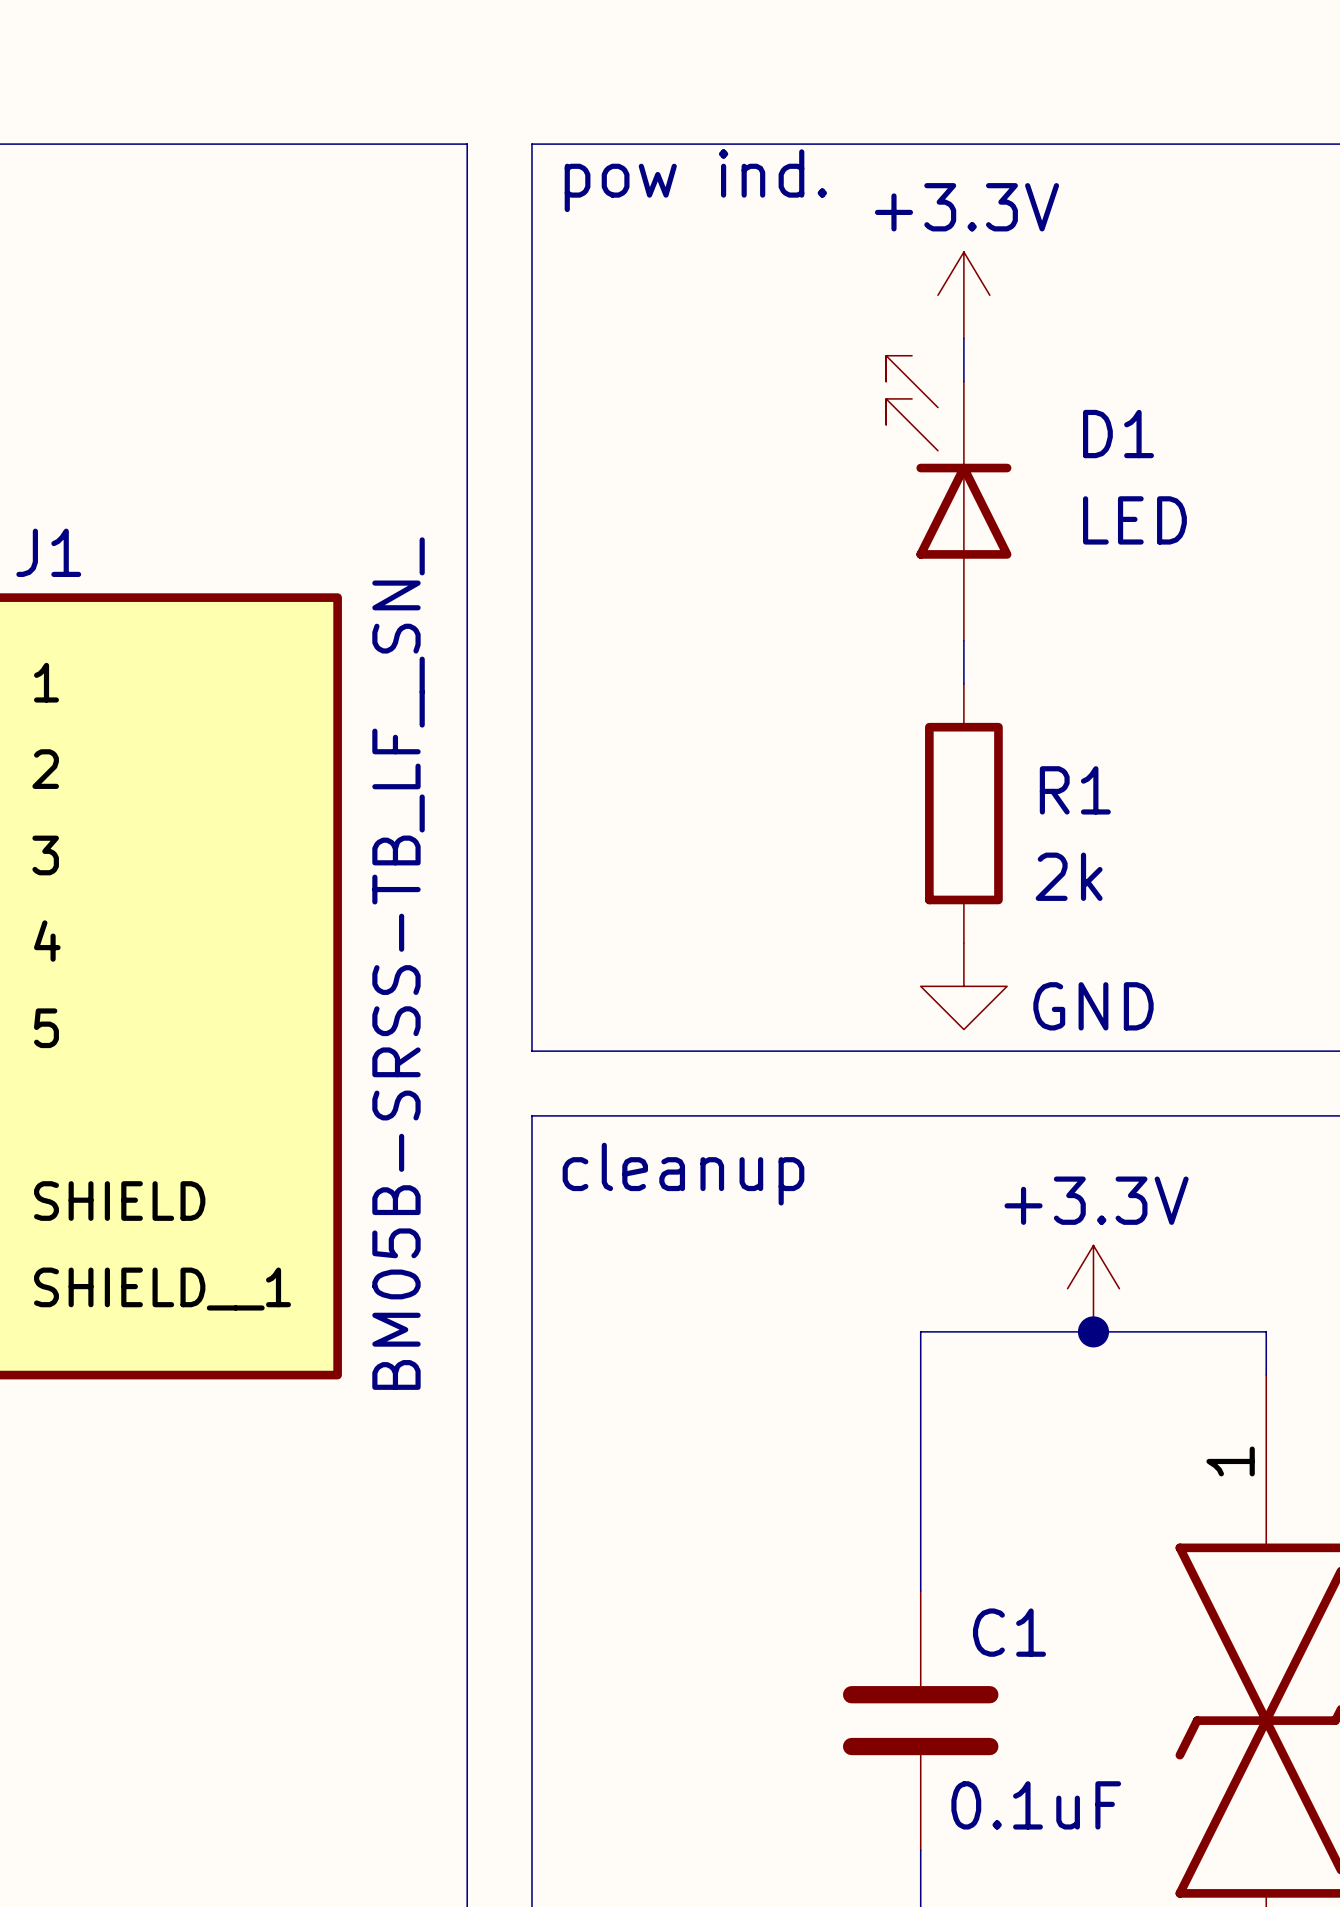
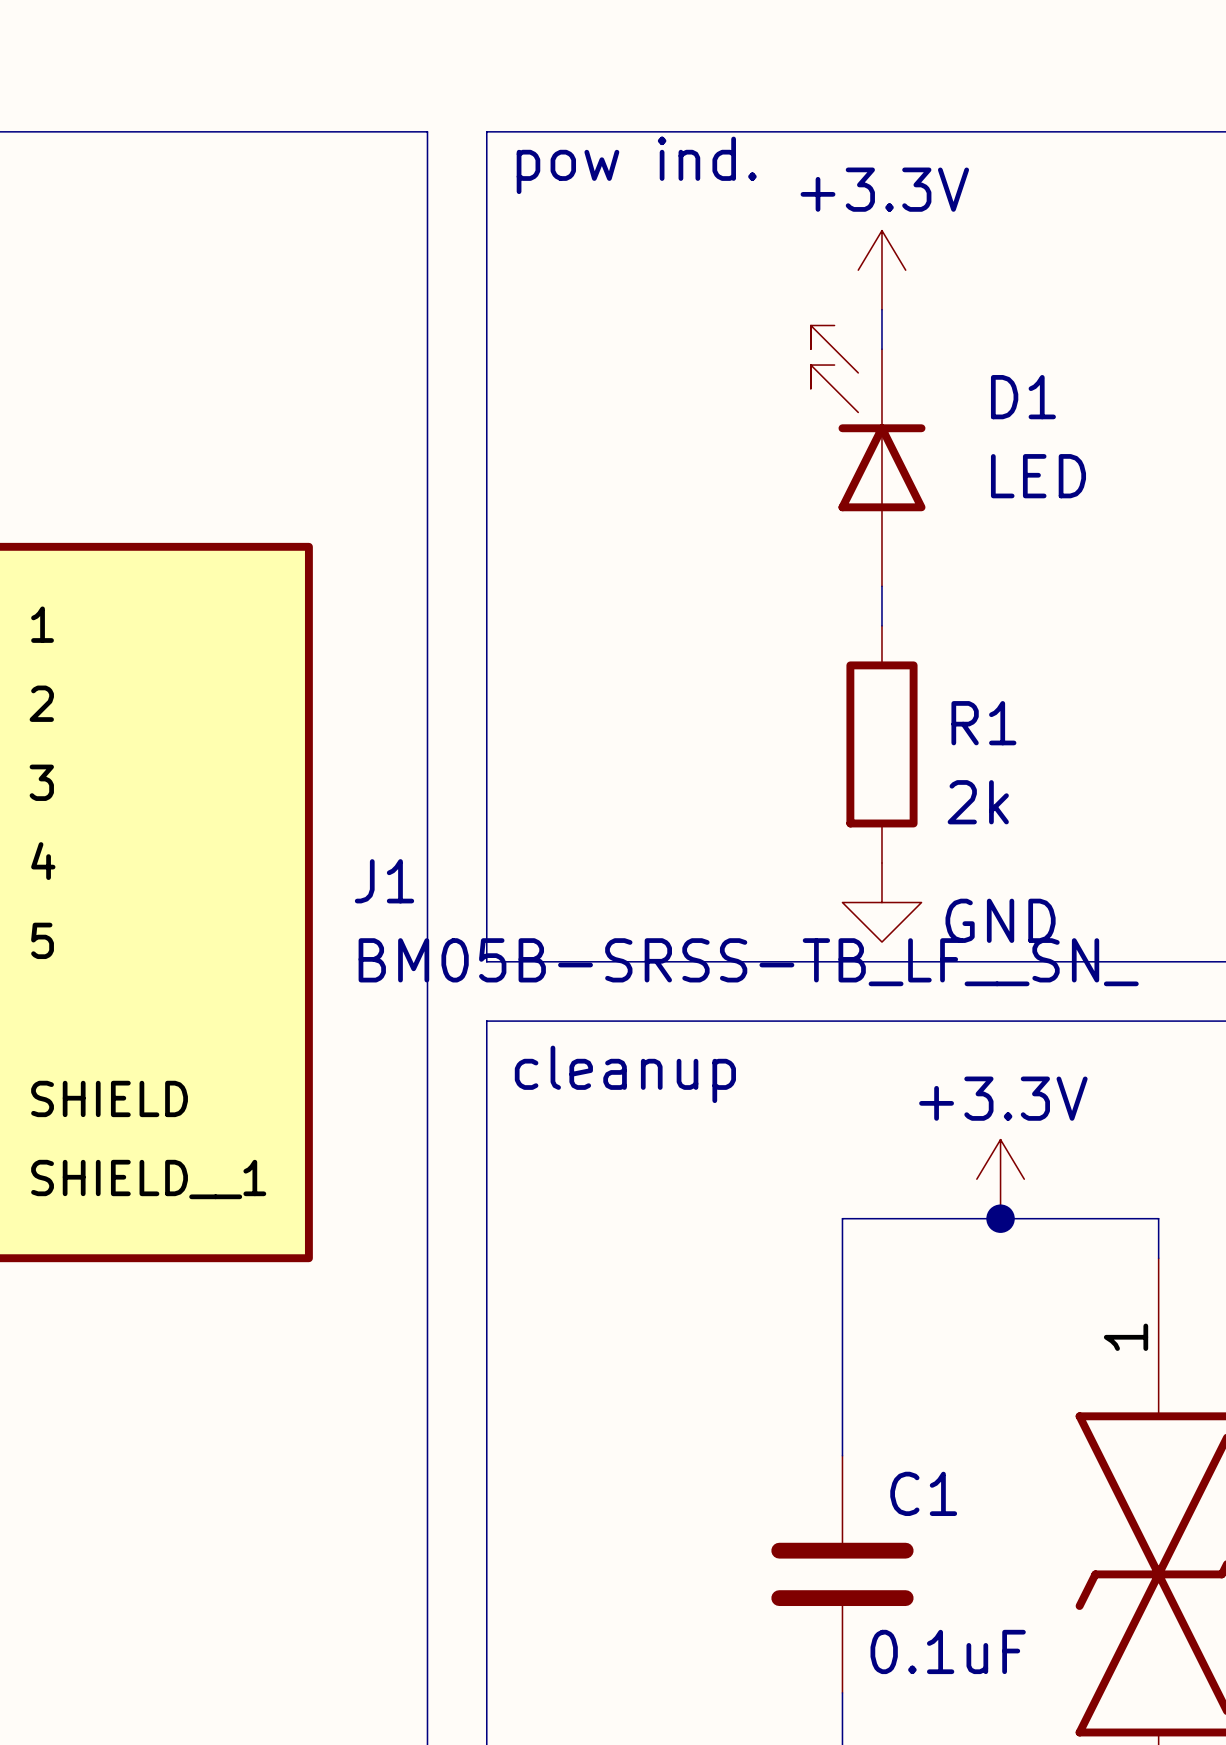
J1 name position: J1 (48, 552) -> J1 (384, 881)
J1 value rotation: 0° (398, 963) -> 90° clockwise (748, 962)

